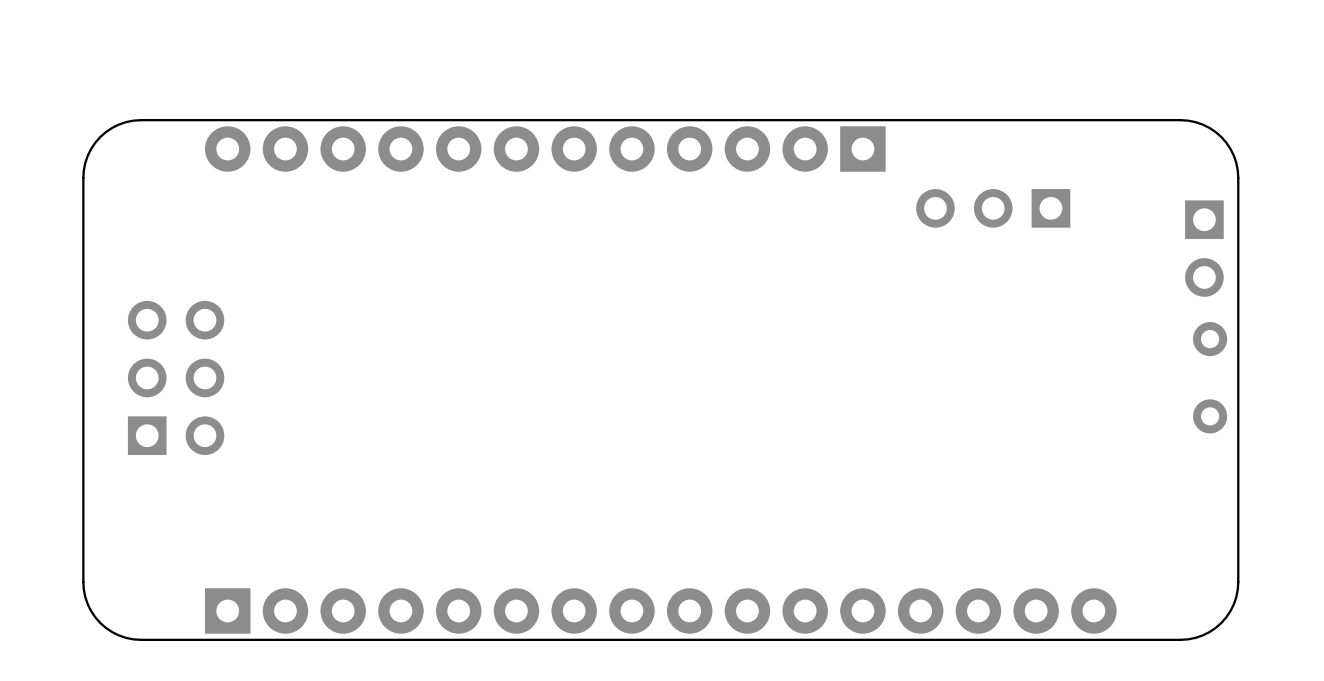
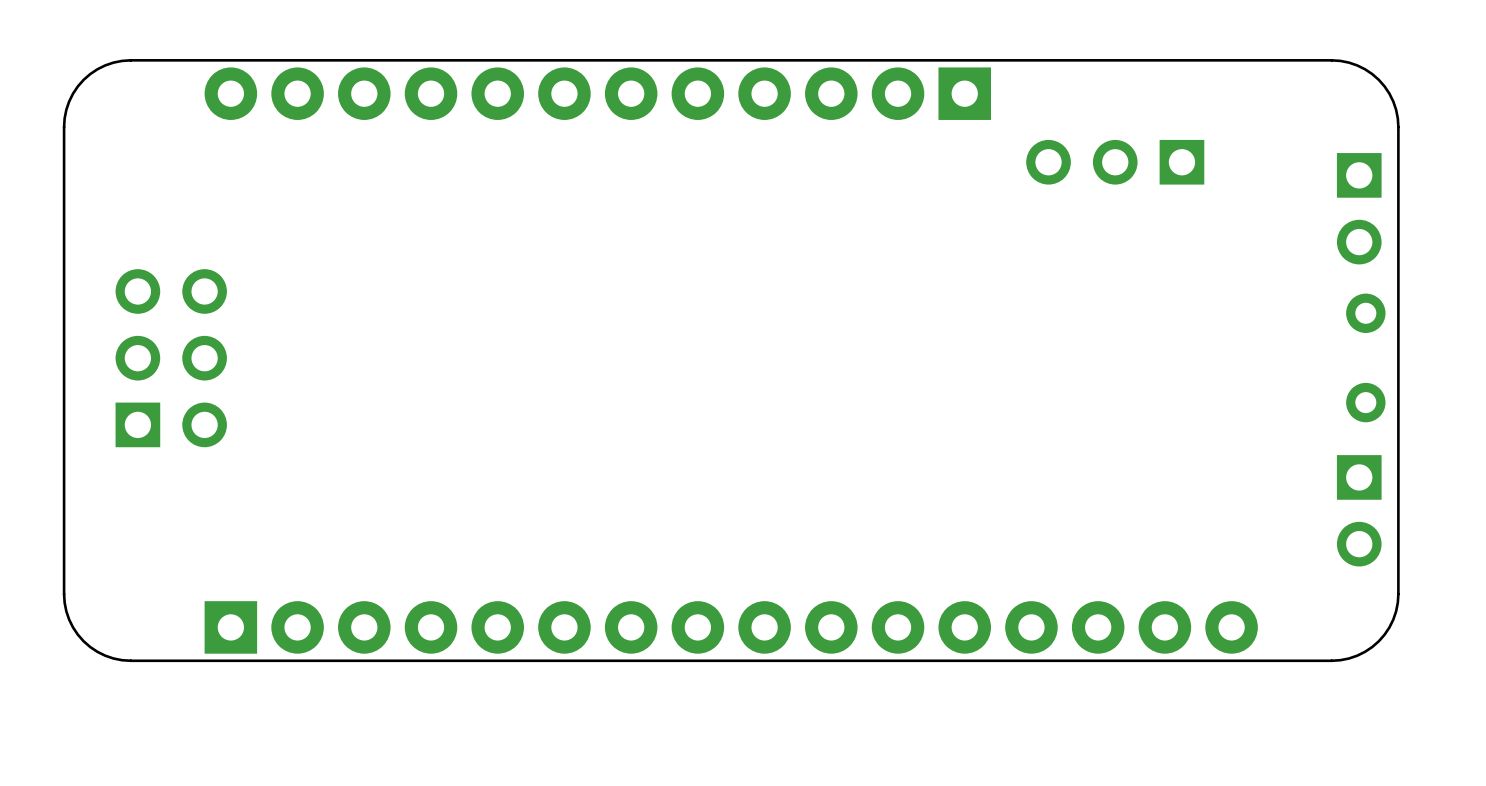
part: none -> (1359, 510)

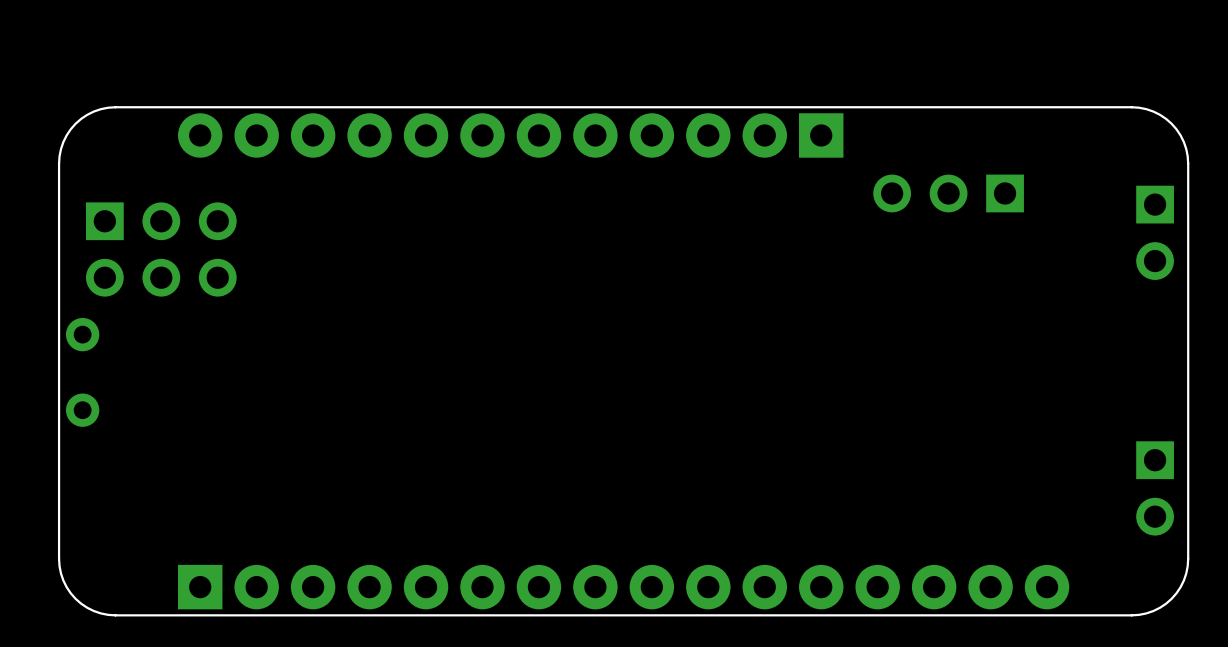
part: (1365, 357) -> none
part rotation: 0° (171, 358) -> 90° clockwise (161, 249)
part position: (171, 358) -> (161, 249)
part: none -> (82, 372)

